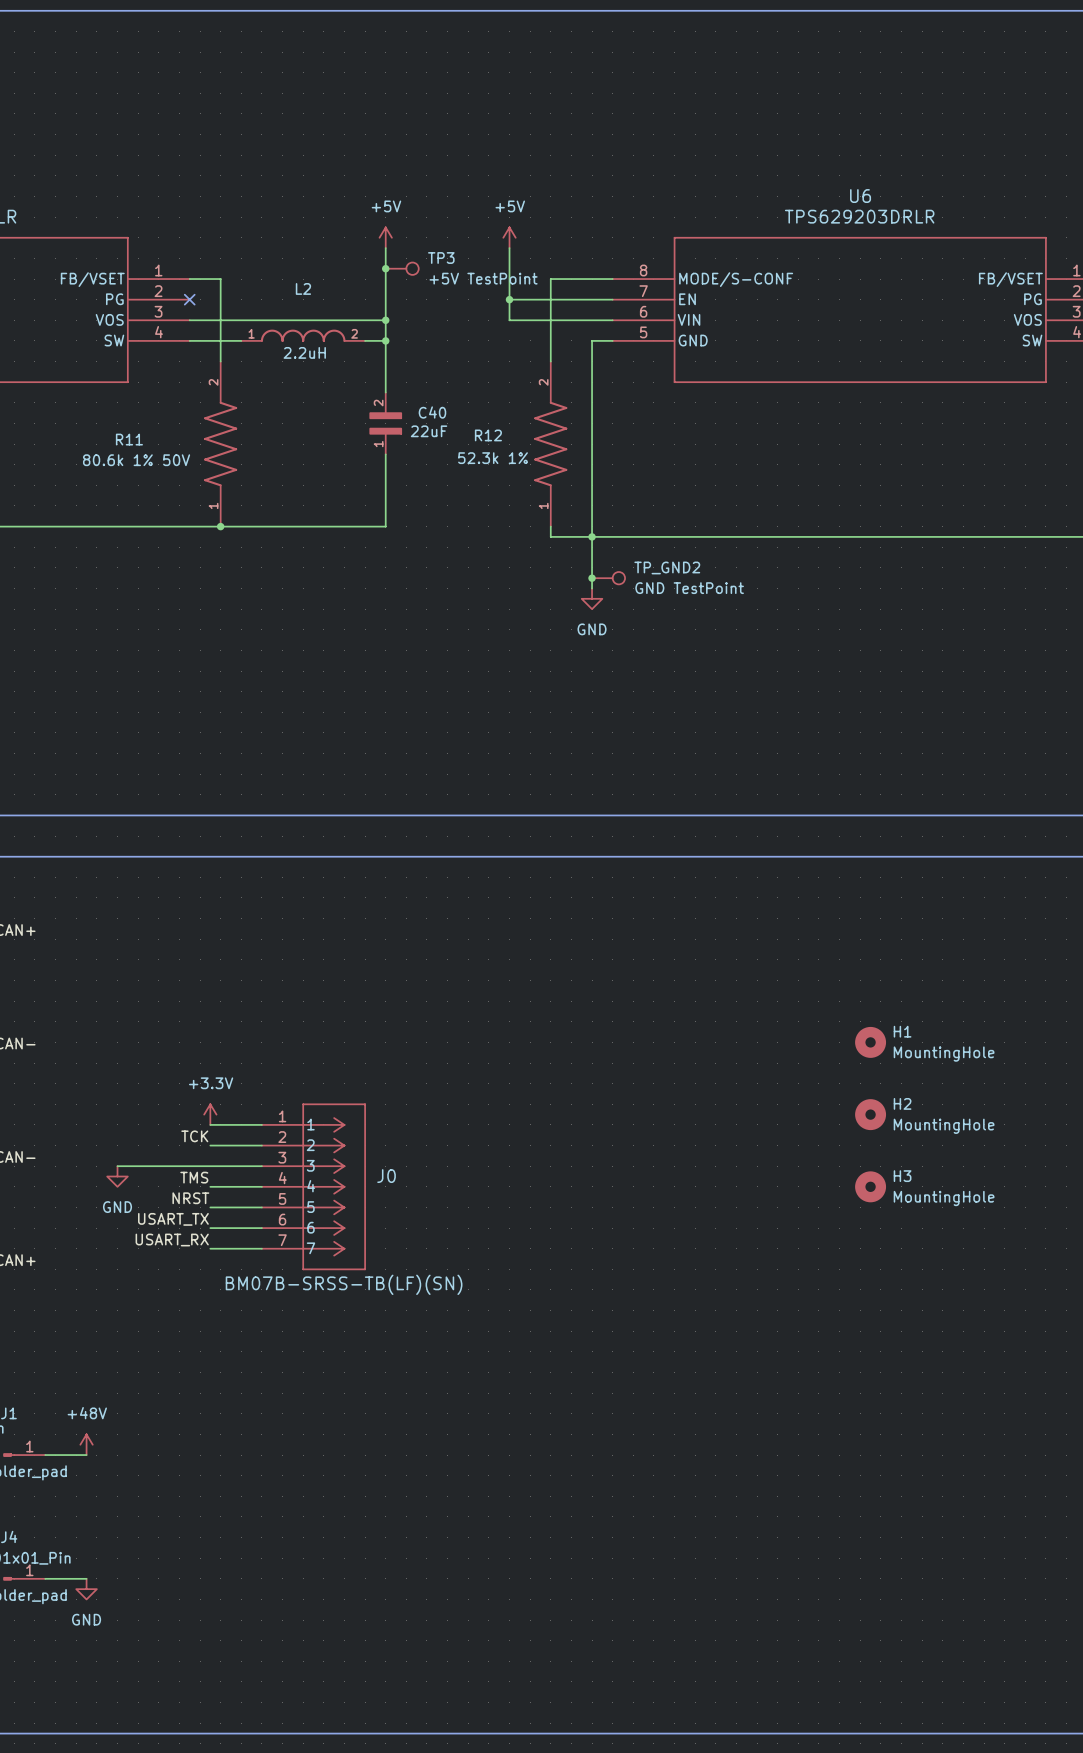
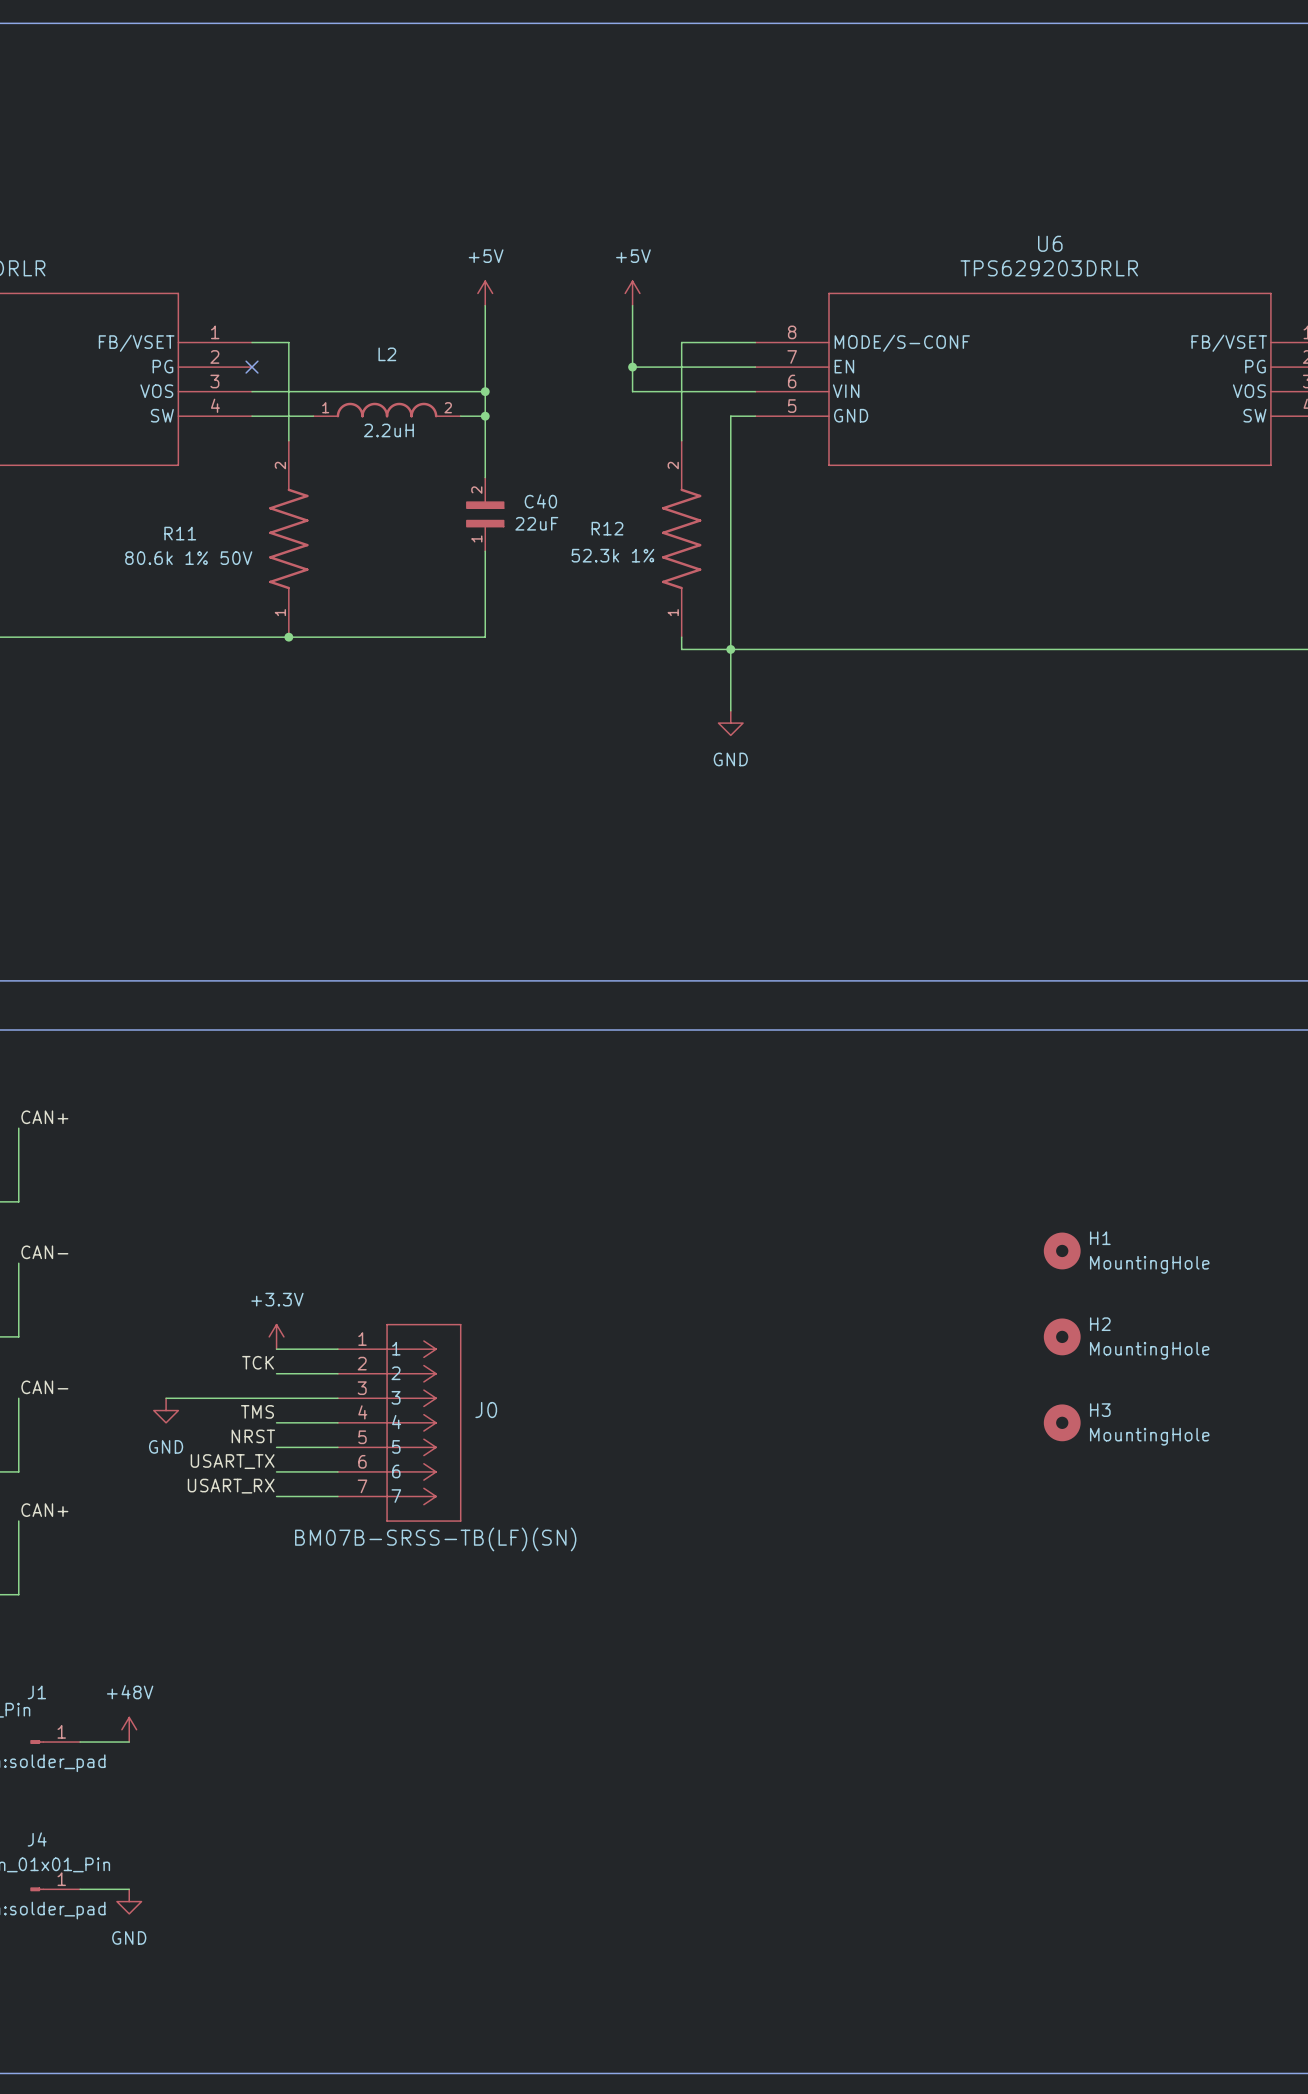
junction: (385, 268) -> none
TP3: +5V TestPoint (402, 268) -> none
junction: (592, 578) -> none
TP_GND2: GND TestPoint (608, 578) -> none

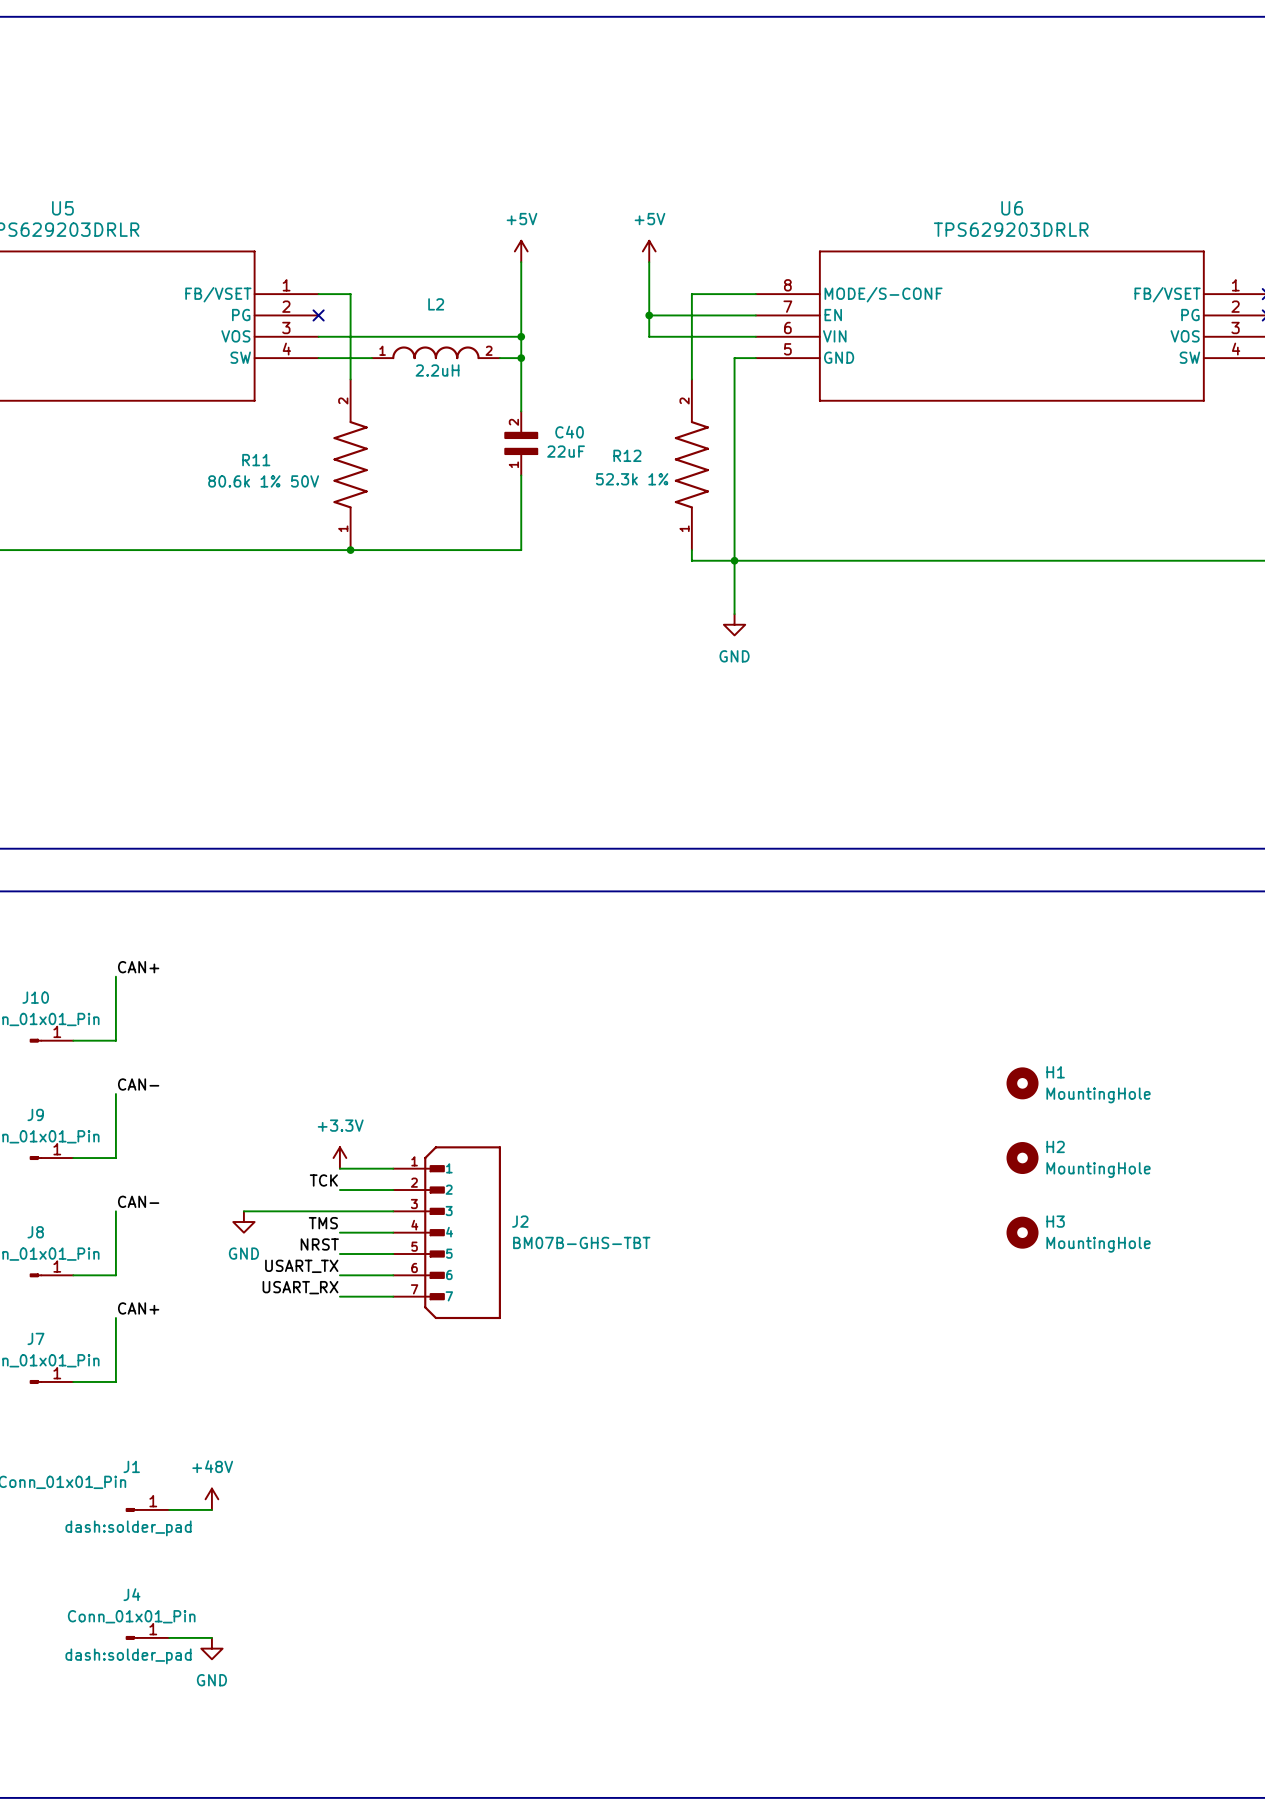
J0: BM07B-SRSS-TB(LF)(SN) (399, 1422) -> none
J2: none -> BM07B-GHS-TBT (447, 1232)

